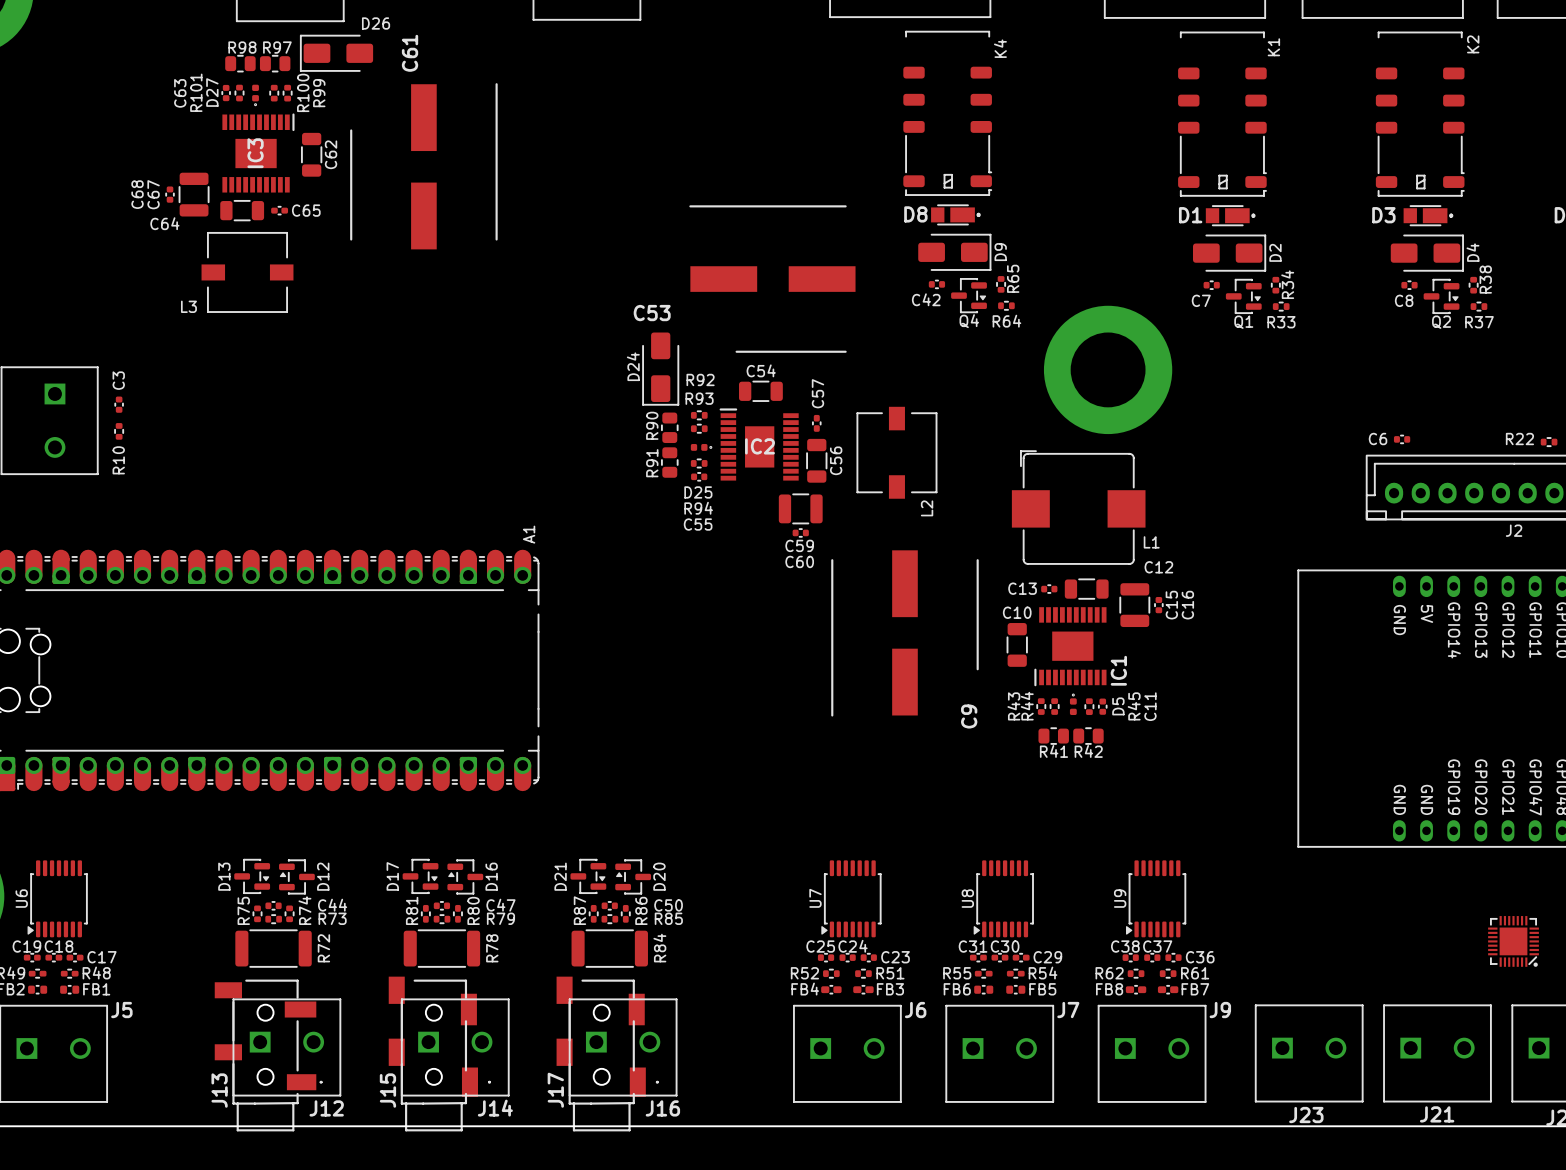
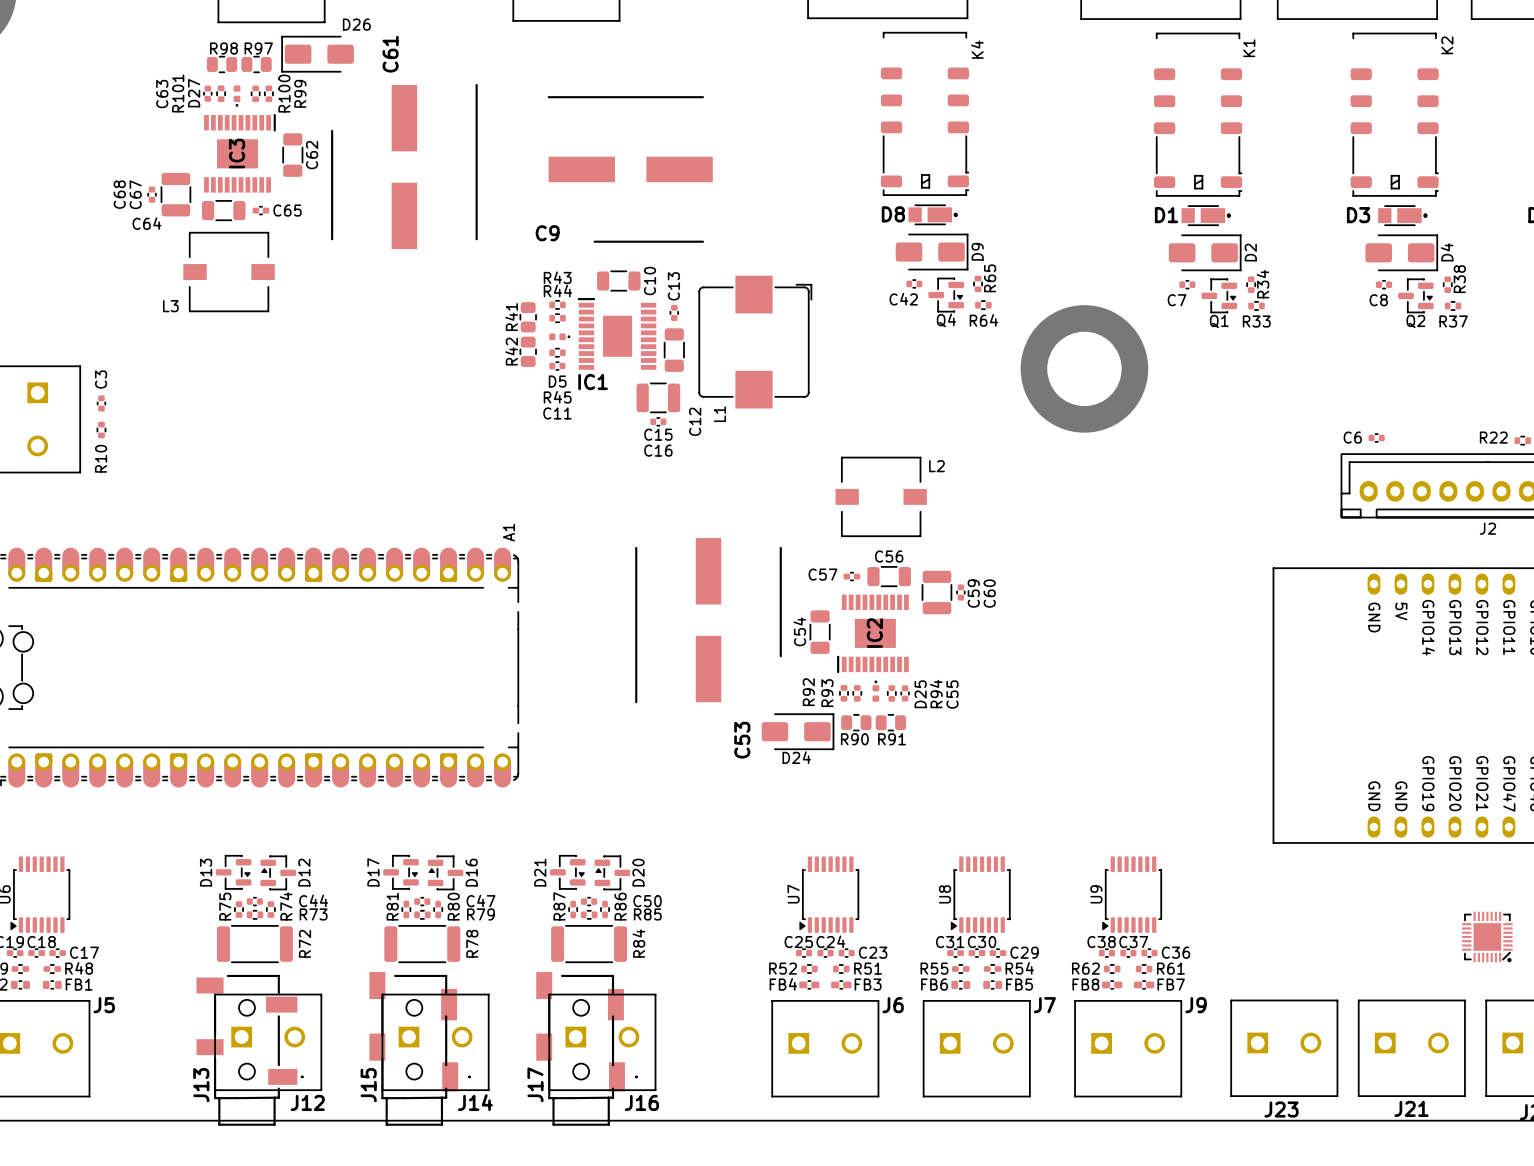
C53 rotation: 0° (772, 279) -> 90° counterclockwise (708, 620)
C53 position: (772, 279) -> (708, 620)
D24 rotation: 0° (660, 368) -> 90° counterclockwise (797, 731)
D24 position: (660, 368) -> (797, 731)
C54 name position: C54 (761, 370) -> C54 (799, 631)
R92 name position: R92 (700, 379) -> R92 (808, 692)
C54 rotation: 0° (760, 391) -> 90° clockwise (820, 632)
C54 position: (760, 391) -> (820, 632)
C57 name position: C57 (817, 393) -> C57 (822, 574)
R93 name position: R93 (699, 398) -> R93 (827, 693)
R92 rotation: 0° (699, 415) -> 90° clockwise (843, 693)
R92 position: (699, 415) -> (843, 693)
C57 rotation: 0° (816, 423) -> 90° clockwise (851, 576)
C57 position: (816, 423) -> (851, 576)
R90 name position: R90 (652, 425) -> R90 (854, 739)
R90 rotation: 0° (669, 427) -> 90° clockwise (856, 722)
R90 position: (669, 427) -> (856, 722)
R93 rotation: 0° (699, 428) -> 90° clockwise (857, 693)
R93 position: (699, 428) -> (857, 693)
IC2 rotation: 0° (759, 444) -> 90° counterclockwise (872, 633)
IC2 position: (759, 444) -> (872, 633)
D25 rotation: 0° (701, 447) -> 90° counterclockwise (875, 691)
D25 position: (701, 447) -> (875, 691)
L2 rotation: 0° (896, 452) -> 90° clockwise (881, 496)
C56 rotation: 0° (816, 460) -> 90° clockwise (889, 576)
C56 position: (816, 460) -> (889, 576)
C56 name position: C56 (836, 460) -> C56 (889, 556)
R91 rotation: 0° (669, 462) -> 90° clockwise (890, 722)
R91 position: (669, 462) -> (890, 722)
R91 name position: R91 (652, 463) -> R91 (892, 739)
R94 rotation: 0° (699, 463) -> 90° clockwise (891, 693)
R94 position: (699, 463) -> (891, 693)
C55 rotation: 0° (699, 476) -> 90° clockwise (905, 693)
C55 position: (699, 476) -> (905, 693)
L1 rotation: 0° (1078, 507) -> 90° clockwise (755, 342)
L1 position: (1078, 507) -> (755, 342)
R94 name position: R94 (698, 508) -> R94 (936, 694)
C59 rotation: 0° (800, 508) -> 90° clockwise (936, 592)
C59 position: (800, 508) -> (936, 592)
L2 name position: L2 (927, 508) -> L2 (936, 466)
C55 name position: C55 (698, 524) -> C55 (952, 694)
C60 rotation: 0° (800, 532) -> 90° clockwise (960, 592)
C60 position: (800, 532) -> (960, 592)
C59 name position: C59 (799, 545) -> C59 (973, 593)
C60 name position: C60 (799, 561) -> C60 (989, 593)
C13 rotation: 0° (1049, 589) -> 90° clockwise (674, 312)
C13 position: (1049, 589) -> (674, 312)
C12 rotation: 0° (1086, 589) -> 90° clockwise (674, 350)
C12 position: (1086, 589) -> (674, 350)
C15 rotation: 0° (1134, 605) -> 90° clockwise (658, 397)
C15 position: (1134, 605) -> (658, 397)
C16 rotation: 0° (1158, 605) -> 90° clockwise (658, 421)
C16 position: (1158, 605) -> (658, 421)
C9 rotation: 0° (904, 633) -> 90° clockwise (630, 169)
C9 position: (904, 633) -> (630, 169)
C10 rotation: 0° (1017, 644) -> 90° clockwise (618, 281)
C10 position: (1017, 644) -> (618, 281)
IC1 rotation: 0° (1070, 646) -> 90° clockwise (617, 333)
IC1 position: (1070, 646) -> (617, 333)
D5 rotation: 0° (1073, 704) -> 90° clockwise (559, 336)
D5 position: (1073, 704) -> (559, 336)
R43 rotation: 0° (1041, 706) -> 90° clockwise (557, 304)
R43 position: (1041, 706) -> (557, 304)
R44 rotation: 0° (1054, 706) -> 90° clockwise (557, 318)
R44 position: (1054, 706) -> (557, 318)
R45 rotation: 0° (1089, 706) -> 90° clockwise (557, 352)
R45 position: (1089, 706) -> (557, 352)
C11 rotation: 0° (1102, 706) -> 90° clockwise (557, 366)
C11 position: (1102, 706) -> (557, 366)
R41 rotation: 0° (1053, 736) -> 90° clockwise (528, 317)
R41 position: (1053, 736) -> (528, 317)
R42 rotation: 0° (1088, 736) -> 90° clockwise (528, 351)
R42 position: (1088, 736) -> (528, 351)

